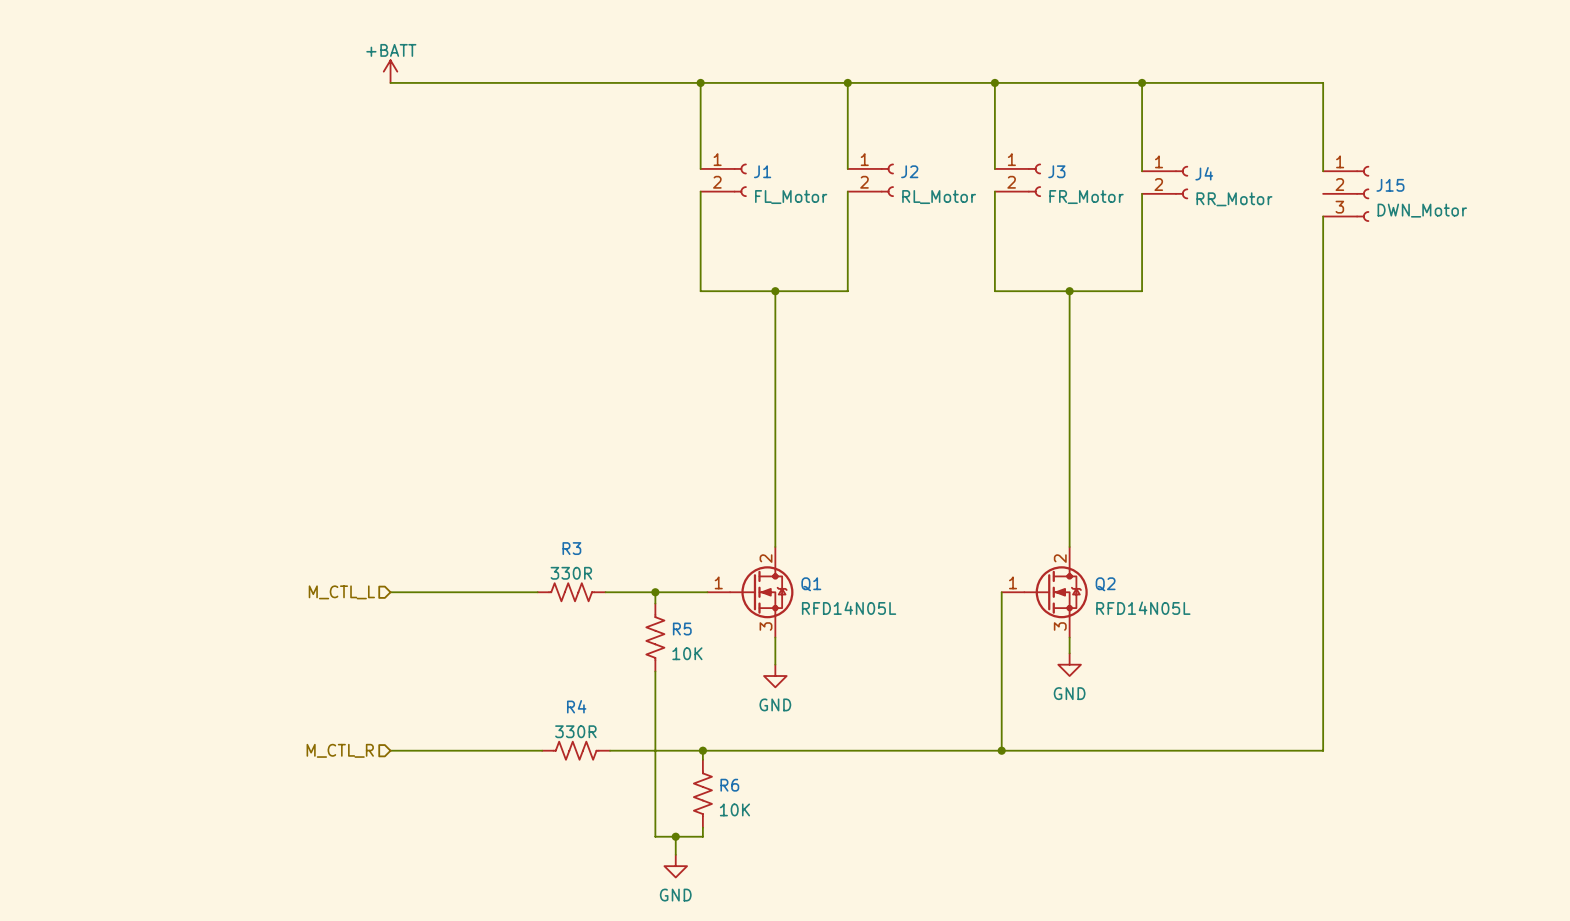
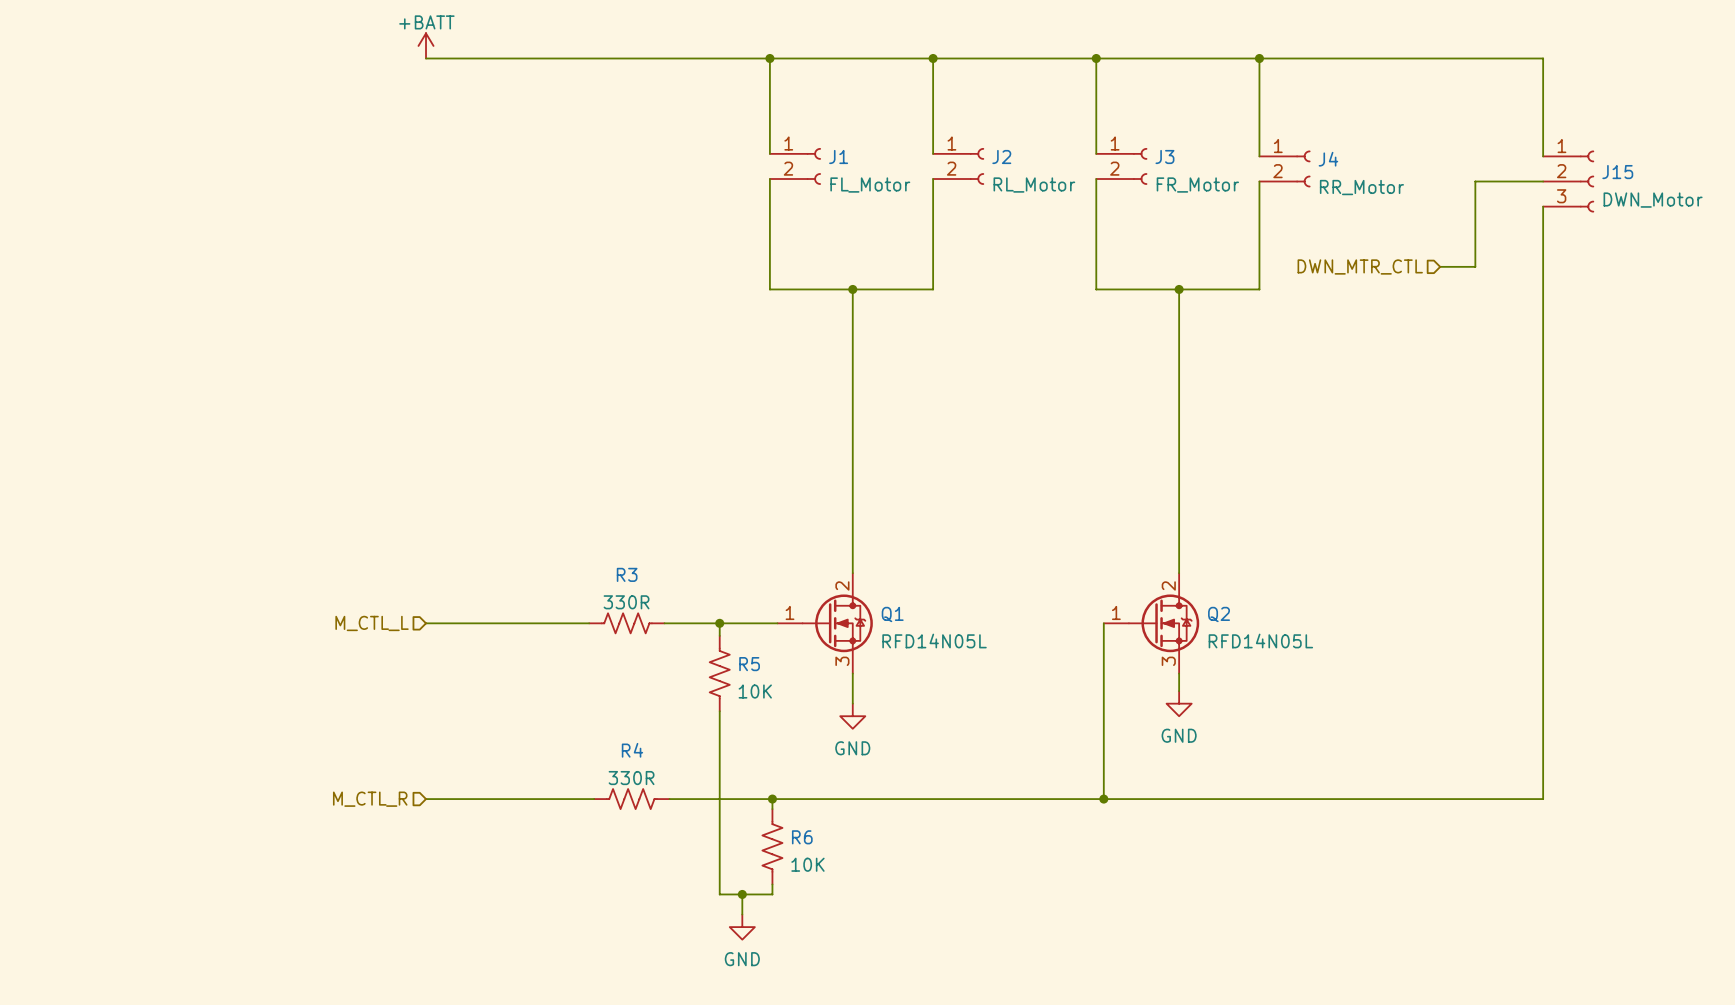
wire: (1323, 82) (1323, 171) -> (1460, 58) (1543, 58) (1543, 156)
J15 position: (1346, 193) -> (1568, 181)
wire: none -> (1543, 181) (1475, 181) (1475, 266) (1440, 266)
wire: (1323, 216) (1323, 750) -> (1543, 206) (1543, 799) (1460, 799)
hierarchical label: none -> DWN_MTR_CTL (1360, 266)

